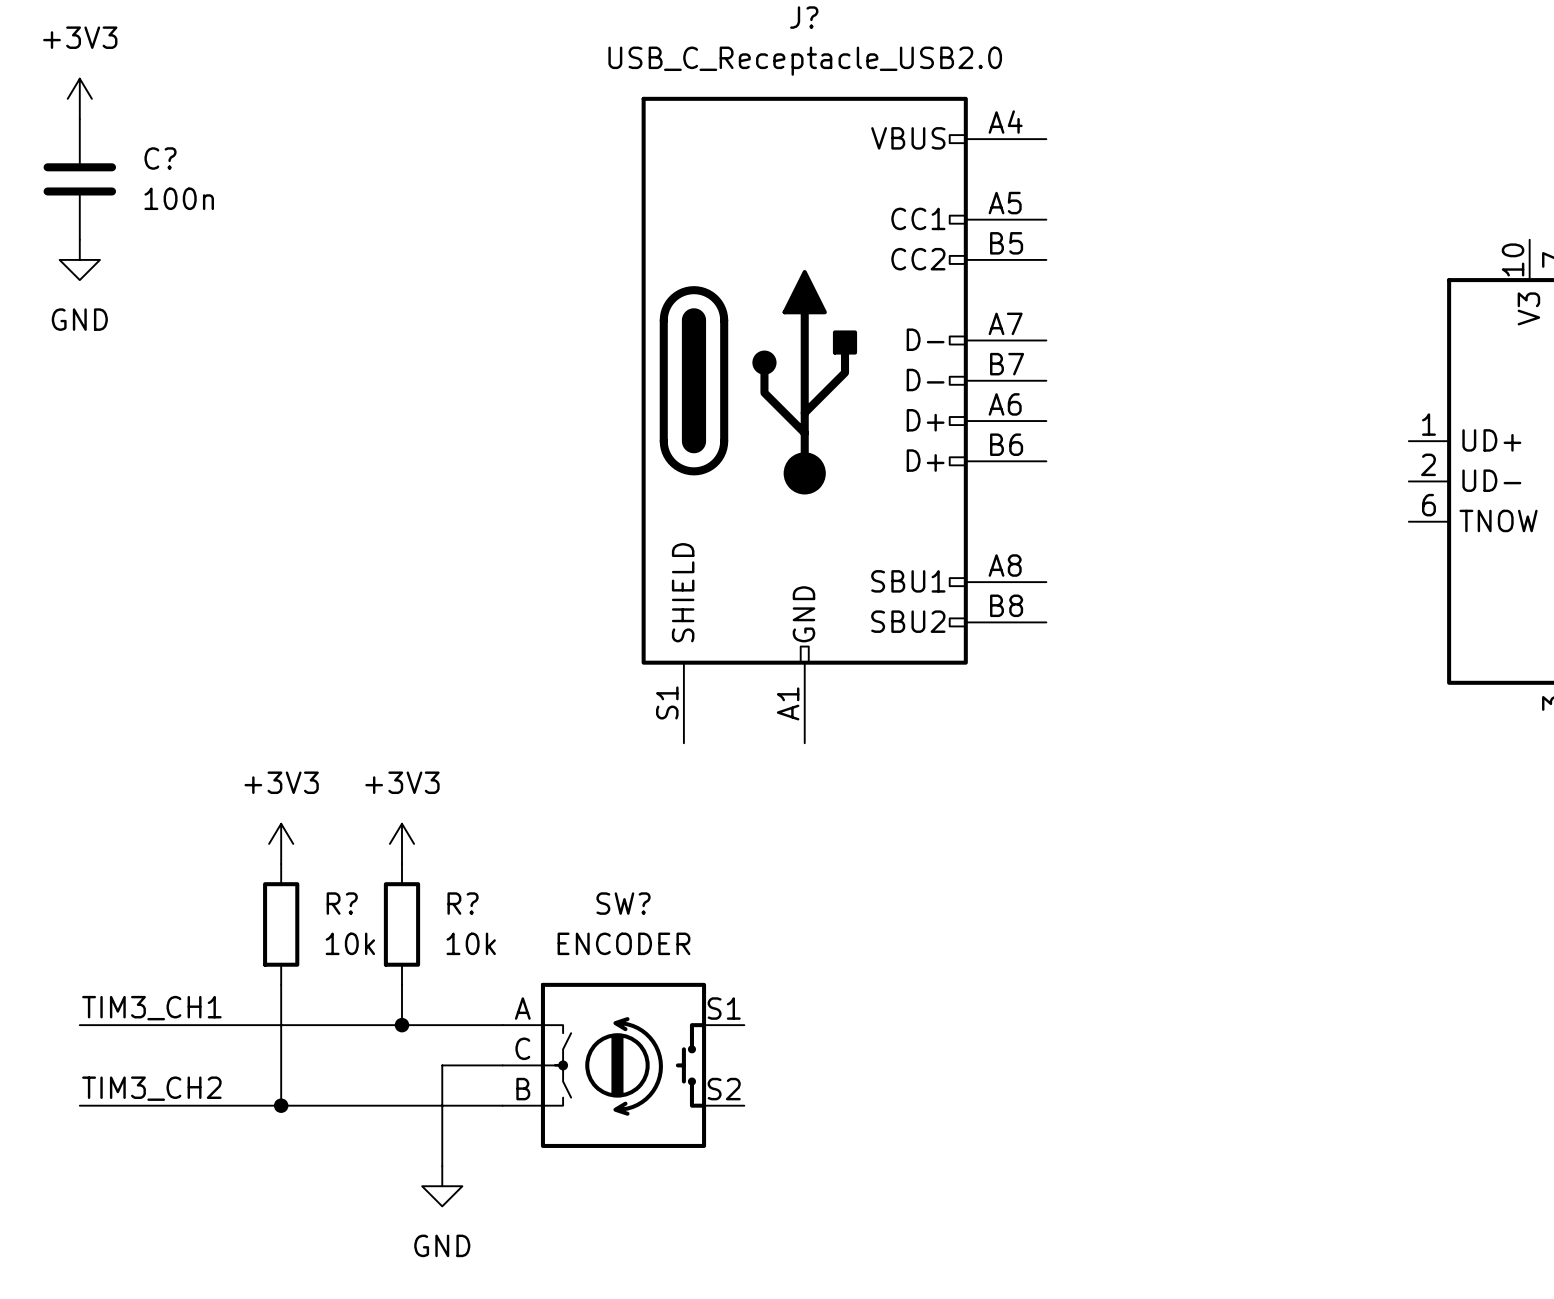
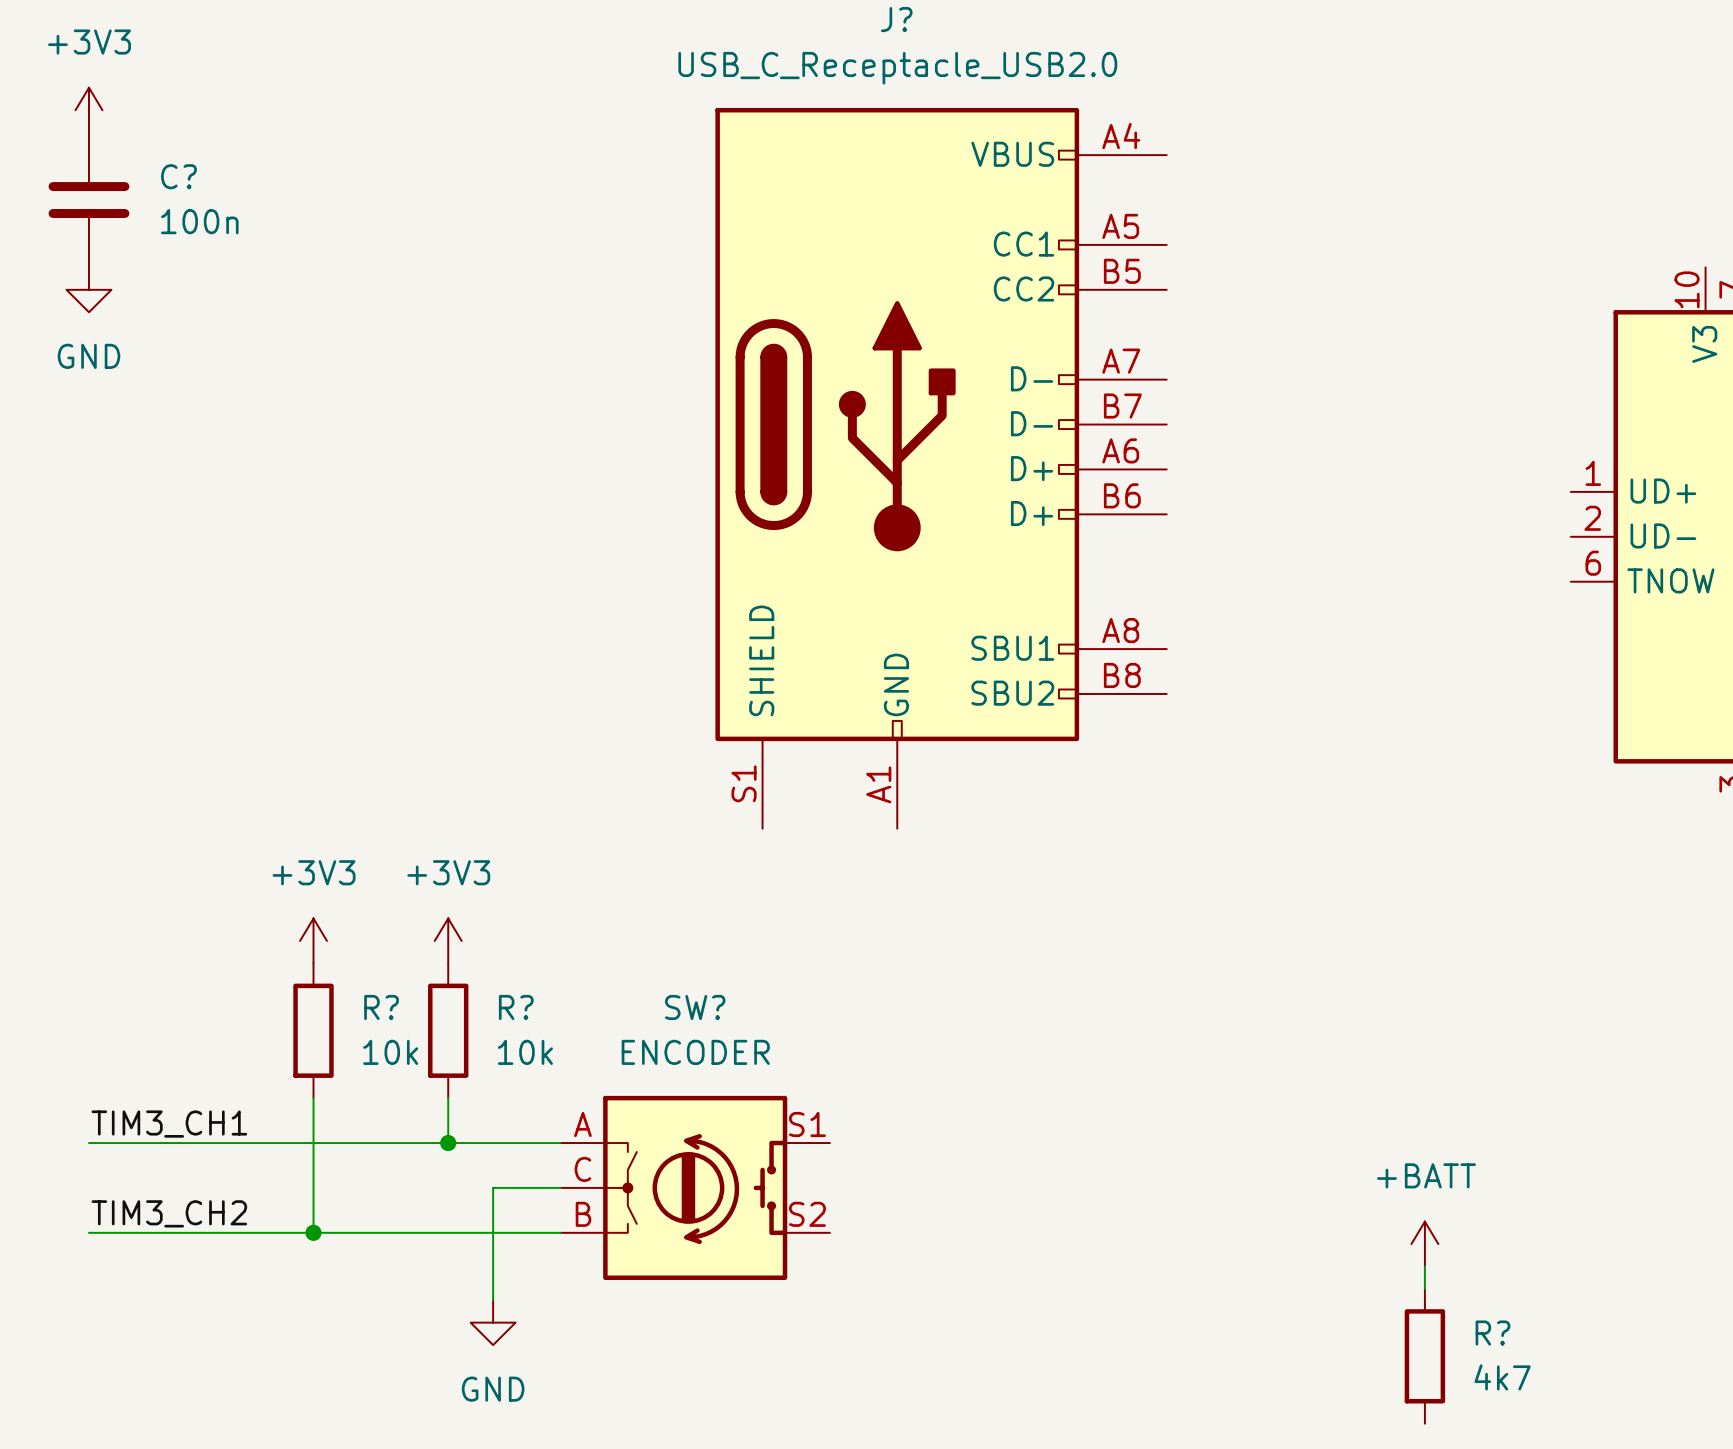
power symbol: none -> +BATT (1424, 1244)
wire: none -> (1424, 1266) (1424, 1288)
R?: none -> 4k7 (1424, 1356)

